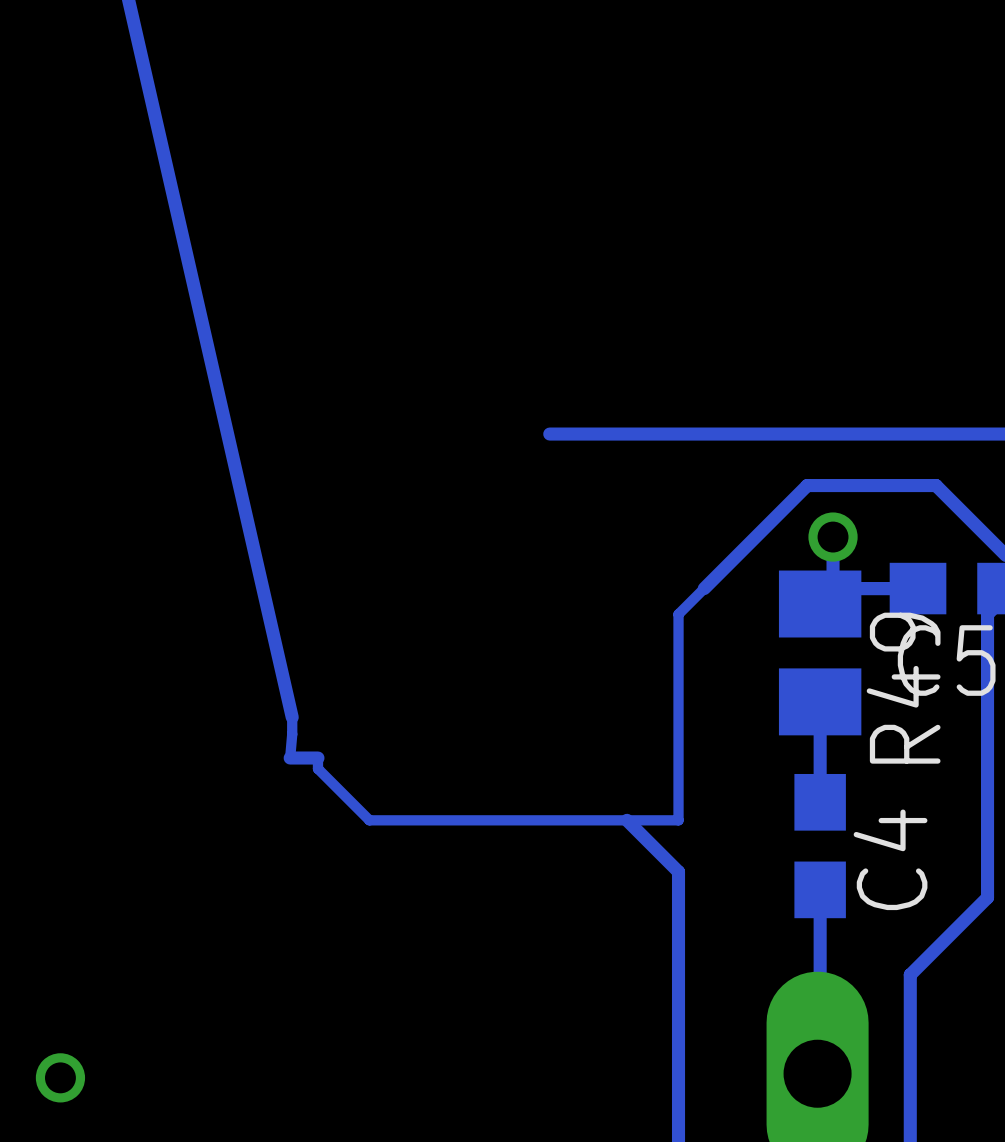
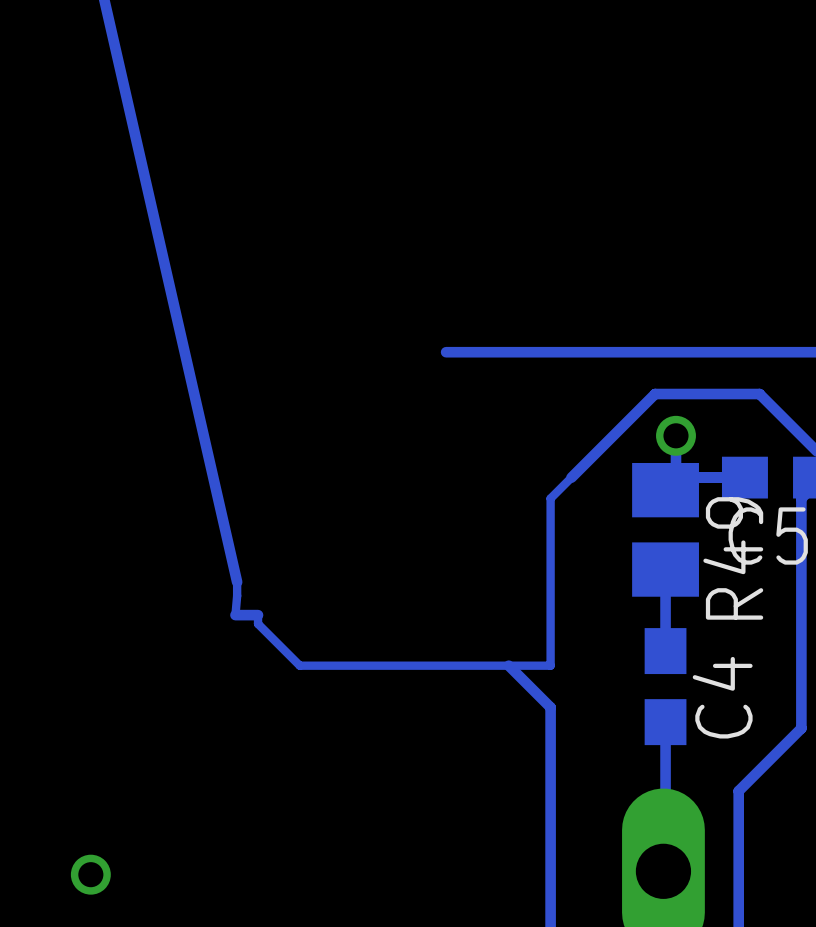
via position: (60, 1077) -> (90, 874)

